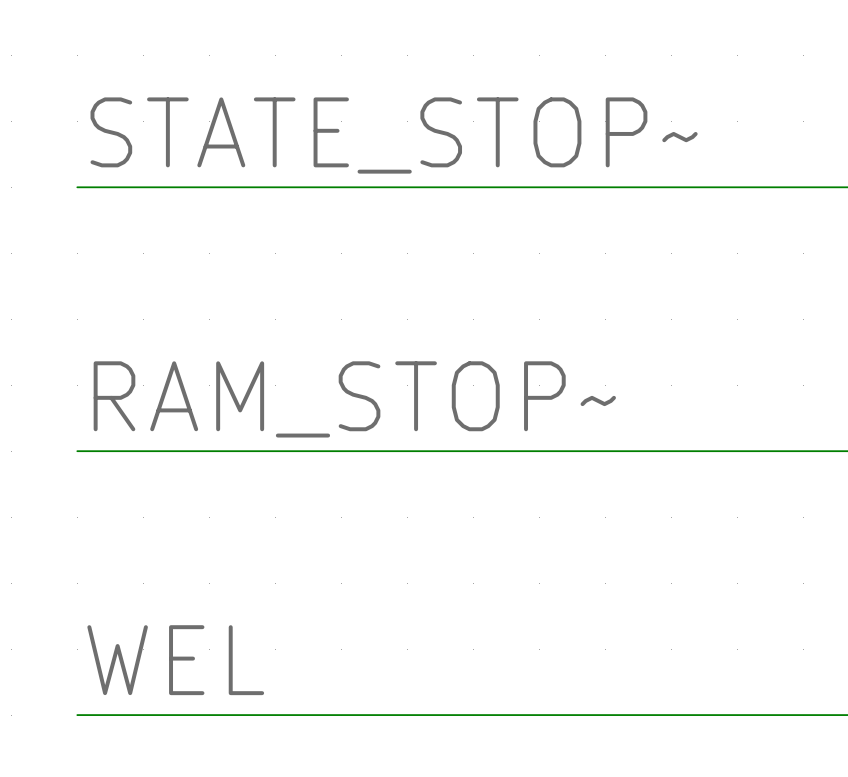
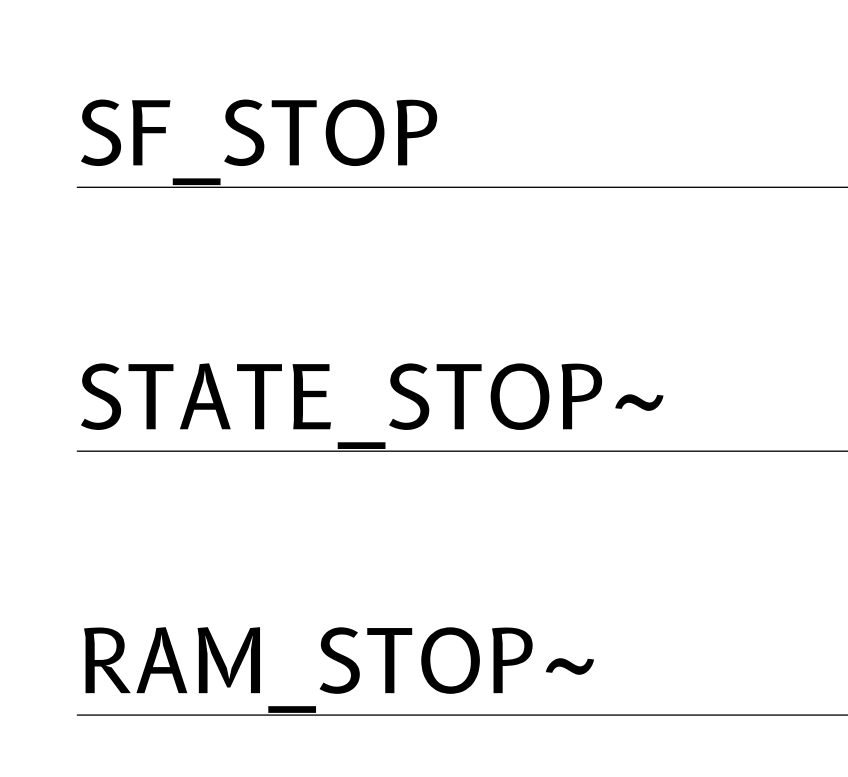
label: STATE_STOP~ (394, 135) -> SF_STOP (259, 142)
label: RAM_STOP~ (354, 399) -> STATE_STOP~ (372, 406)
label: WEL (175, 660) -> RAM_STOP~ (339, 670)

